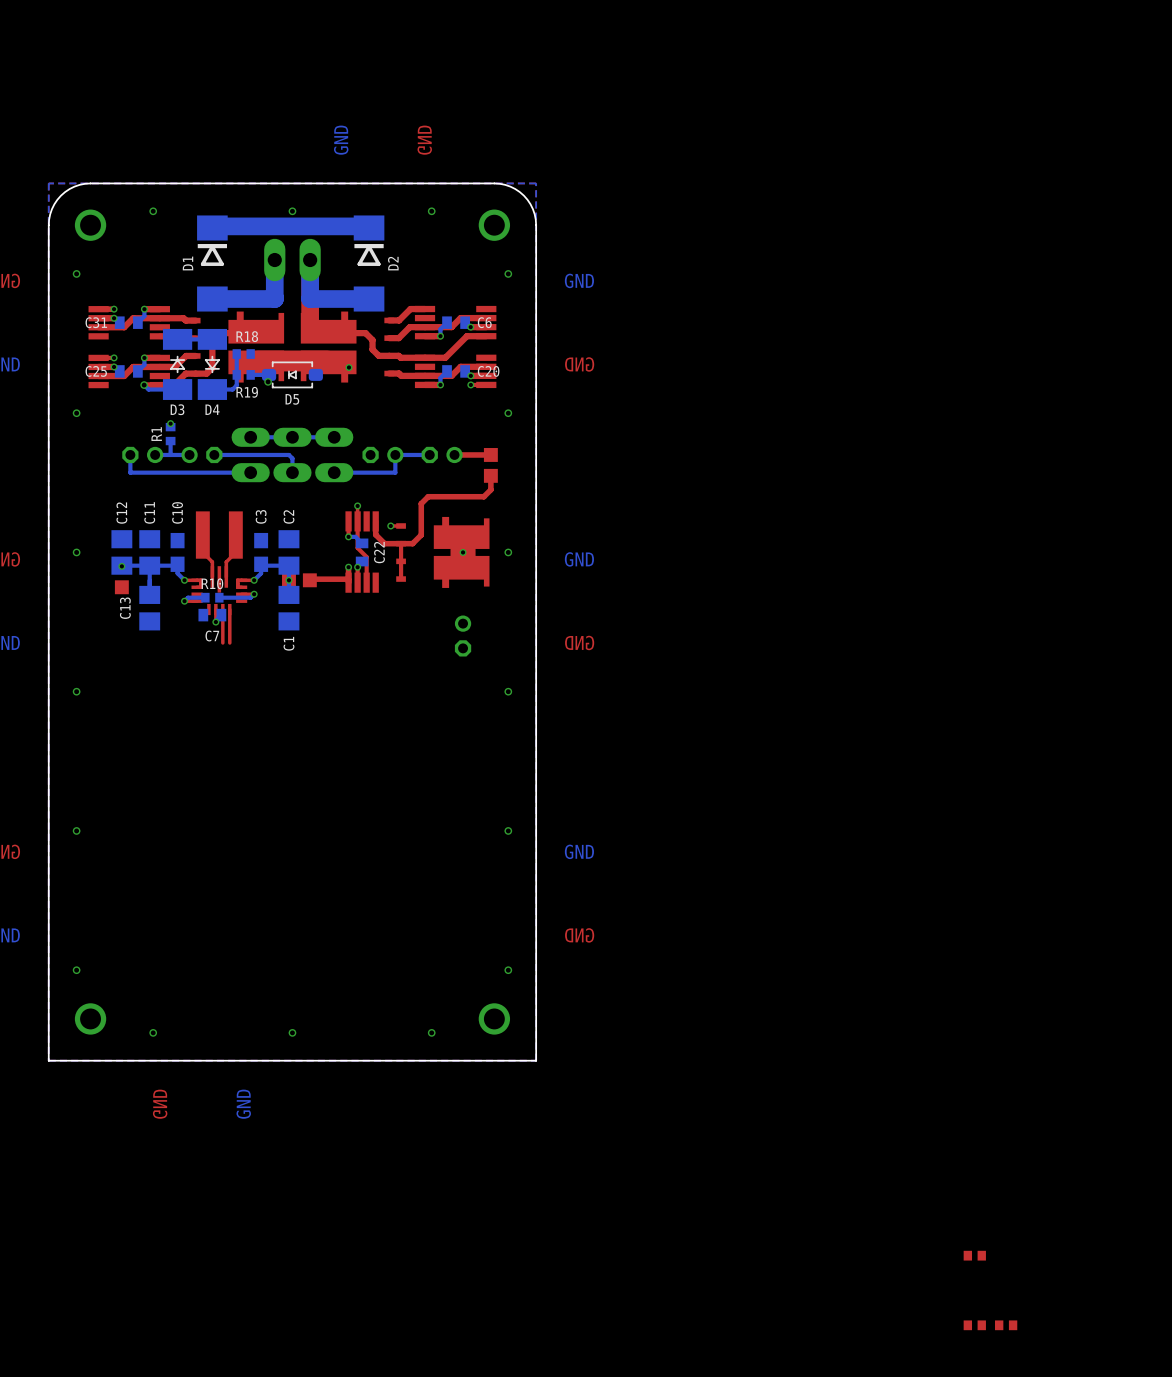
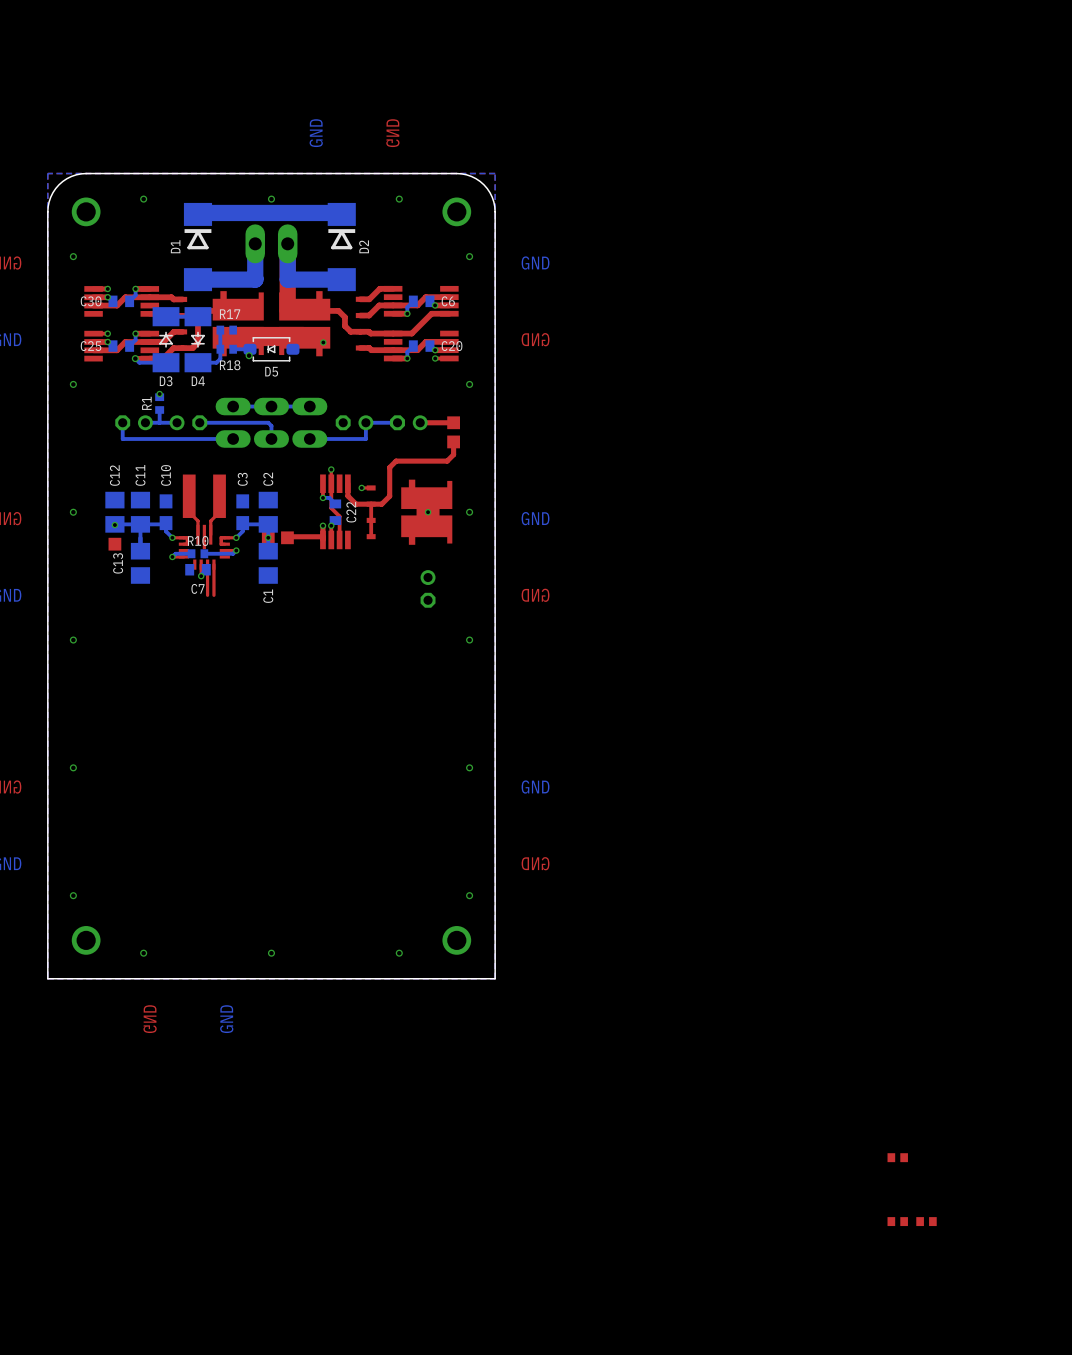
C31 name: C31 (96, 322) -> C30 (91, 301)
R18 name: R18 (247, 336) -> R17 (230, 314)
R19 name: R19 (247, 392) -> R18 (230, 365)

